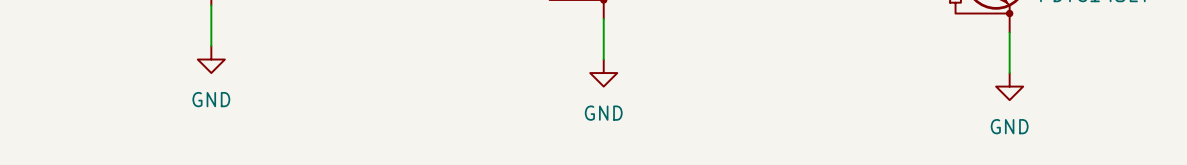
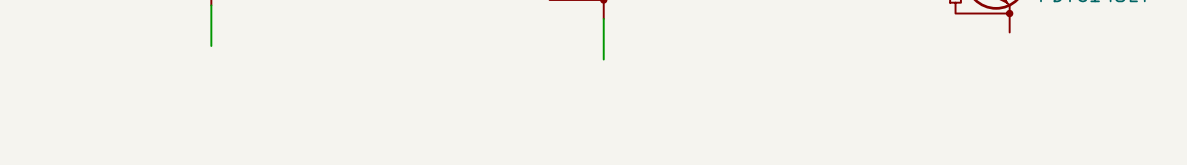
wire: (1009, 32) (1009, 73) -> none
power symbol: GND (211, 59) -> none
power symbol: GND (603, 73) -> none
power symbol: GND (1009, 86) -> none

